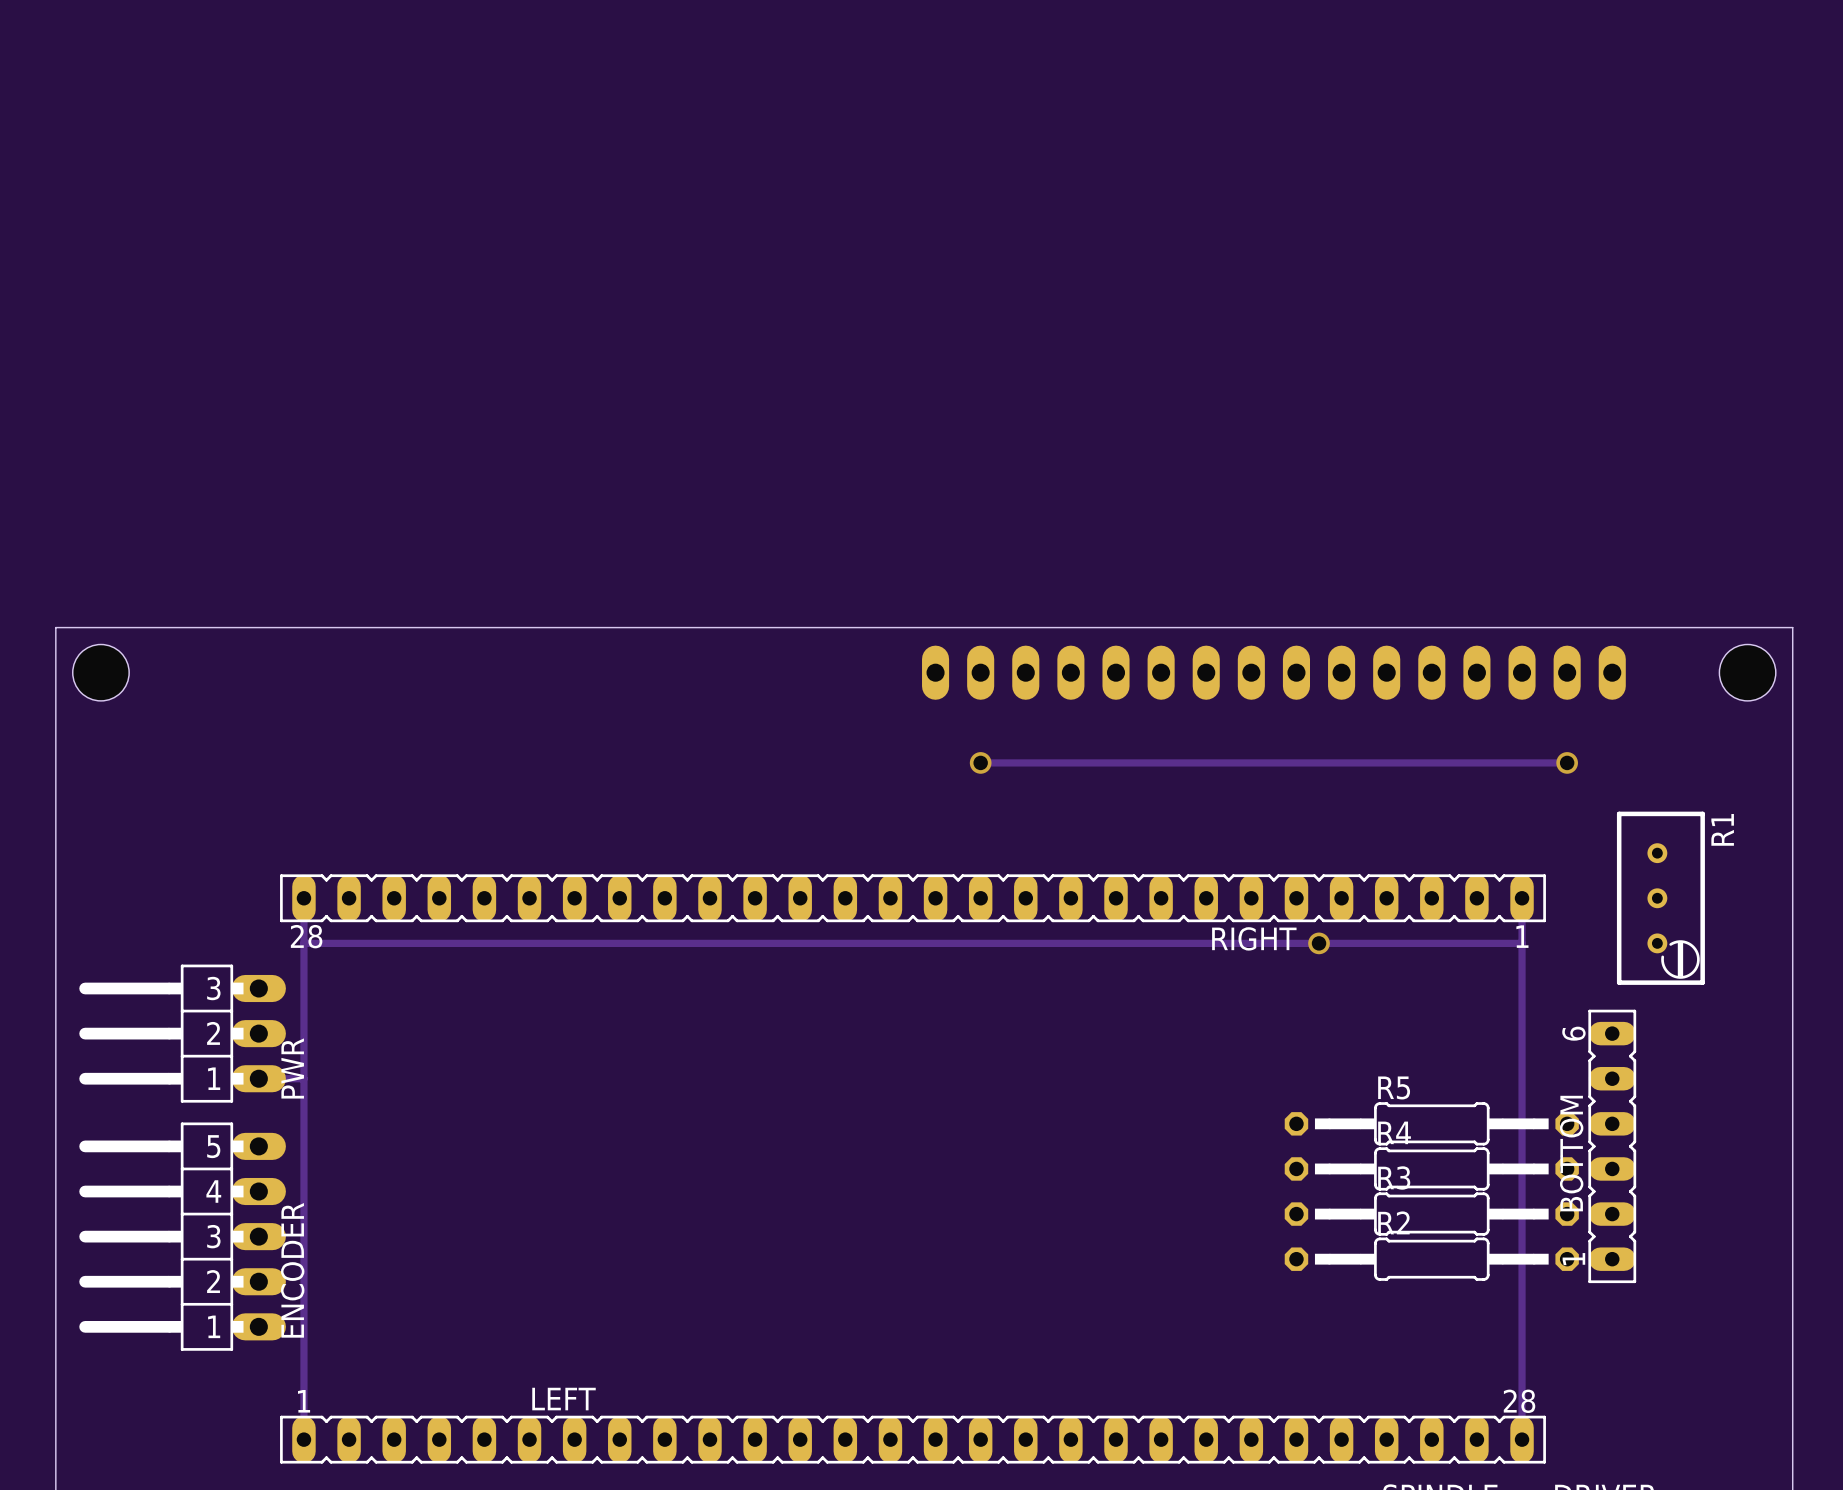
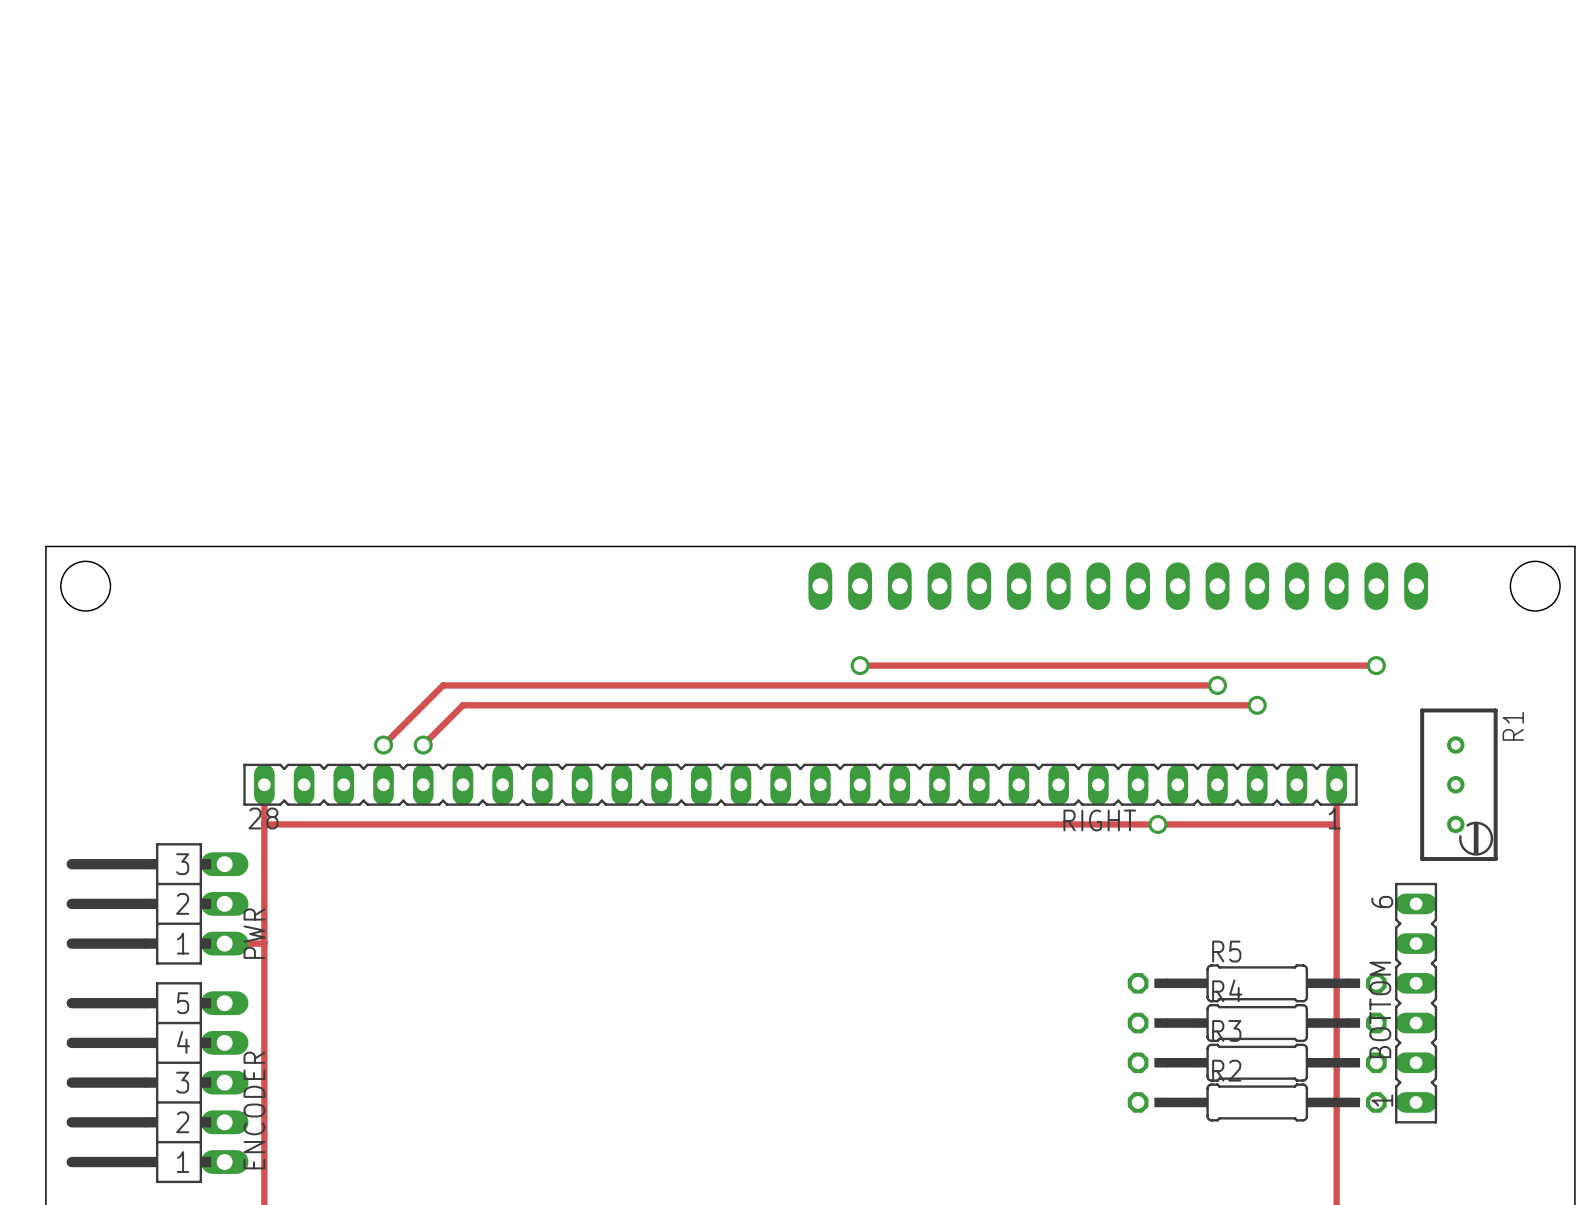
track: none -> (1217, 685) (443, 685) (383, 745)
via: none -> (1217, 685)
track: none -> (1257, 705) (462, 705) (423, 745)
via: none -> (1257, 705)
via: none -> (383, 745)
via: none -> (423, 745)

